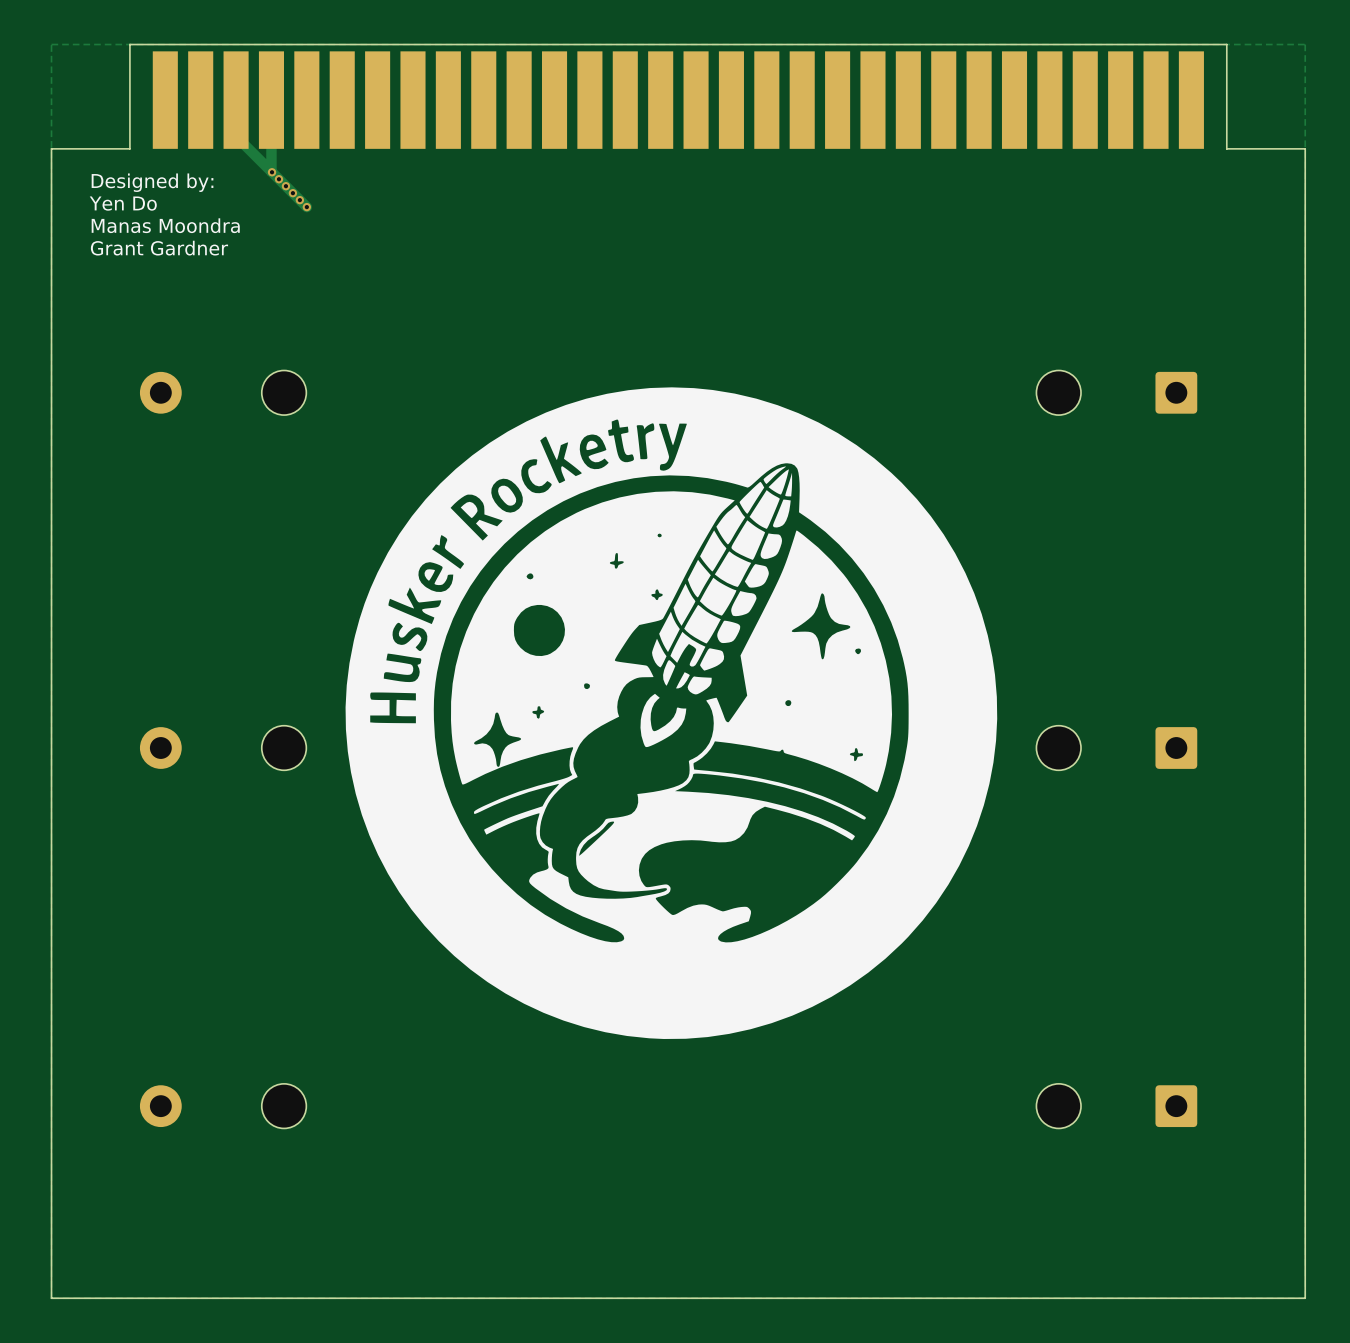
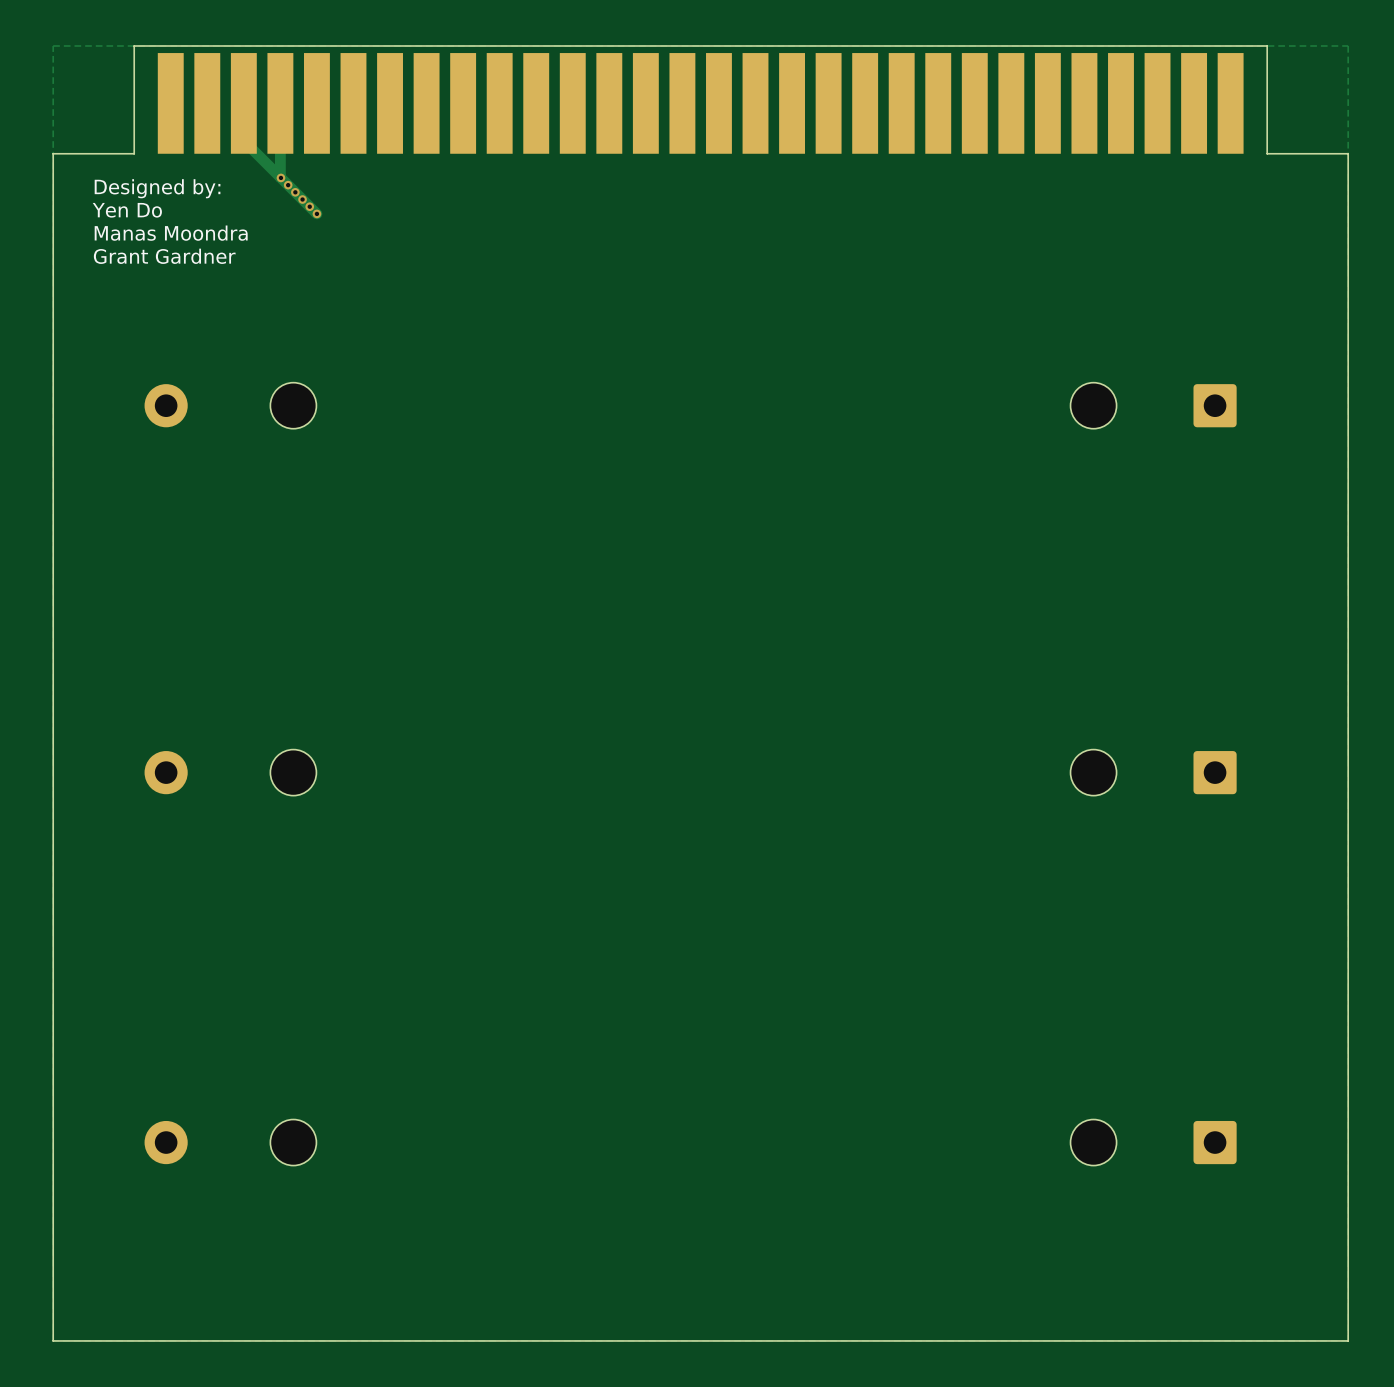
drawing: [345, 387, 998, 1039] -> none

